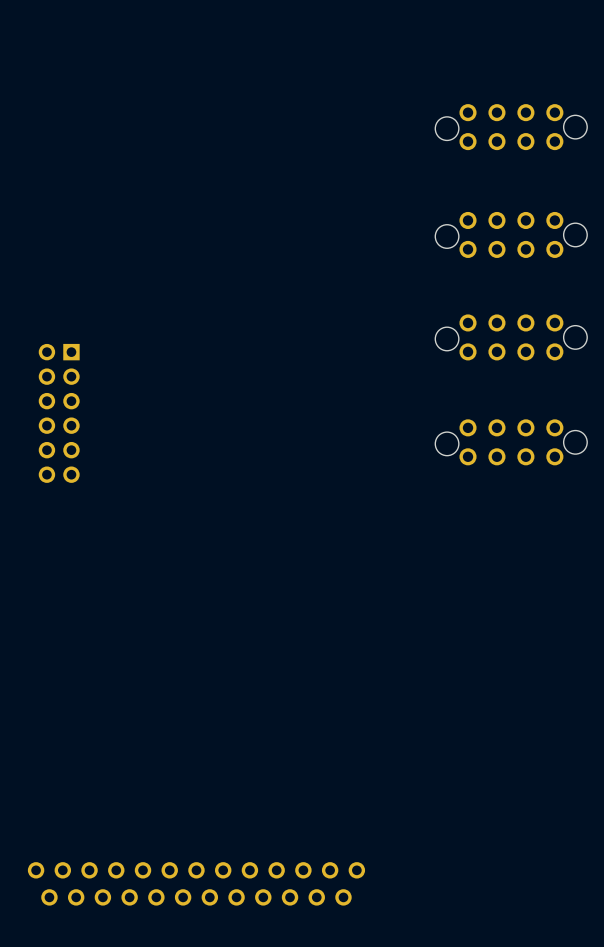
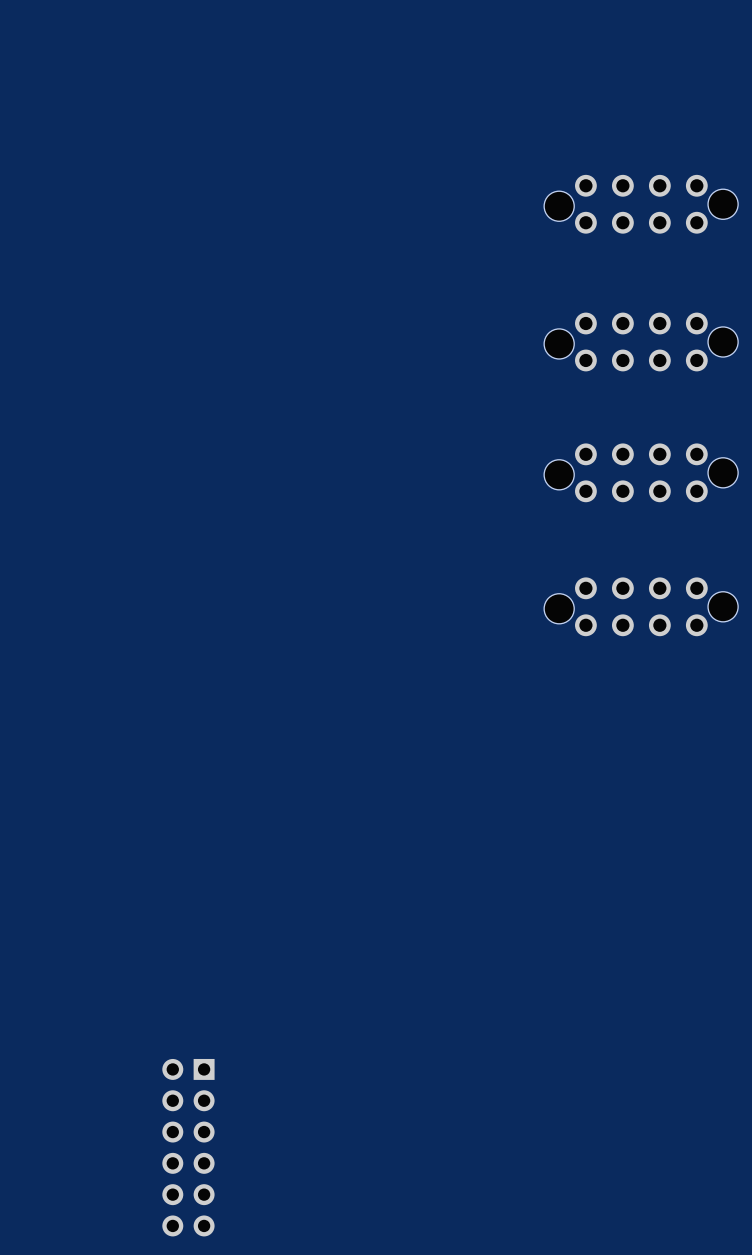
part: (59, 413) -> none
part: none -> (188, 1147)
part: (196, 883) -> none

